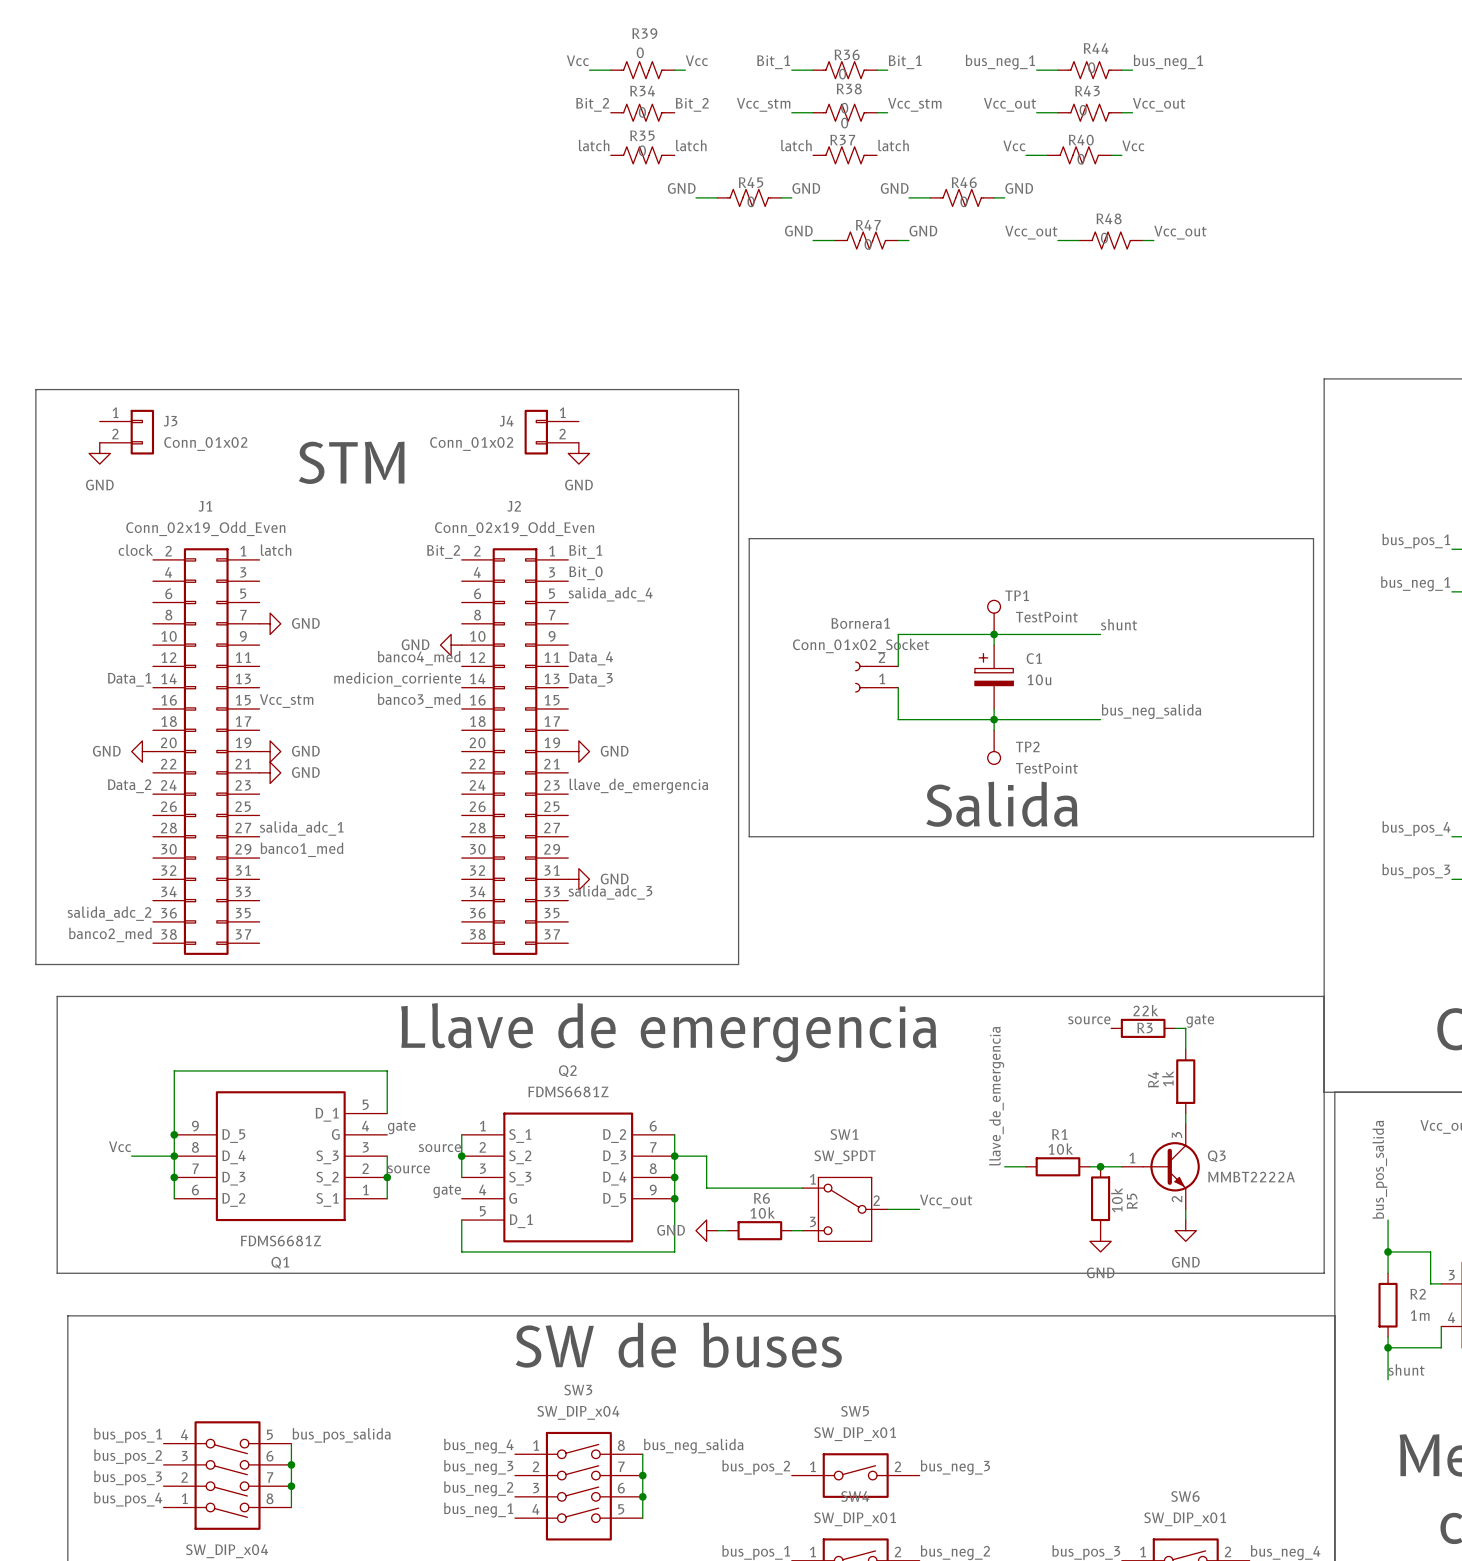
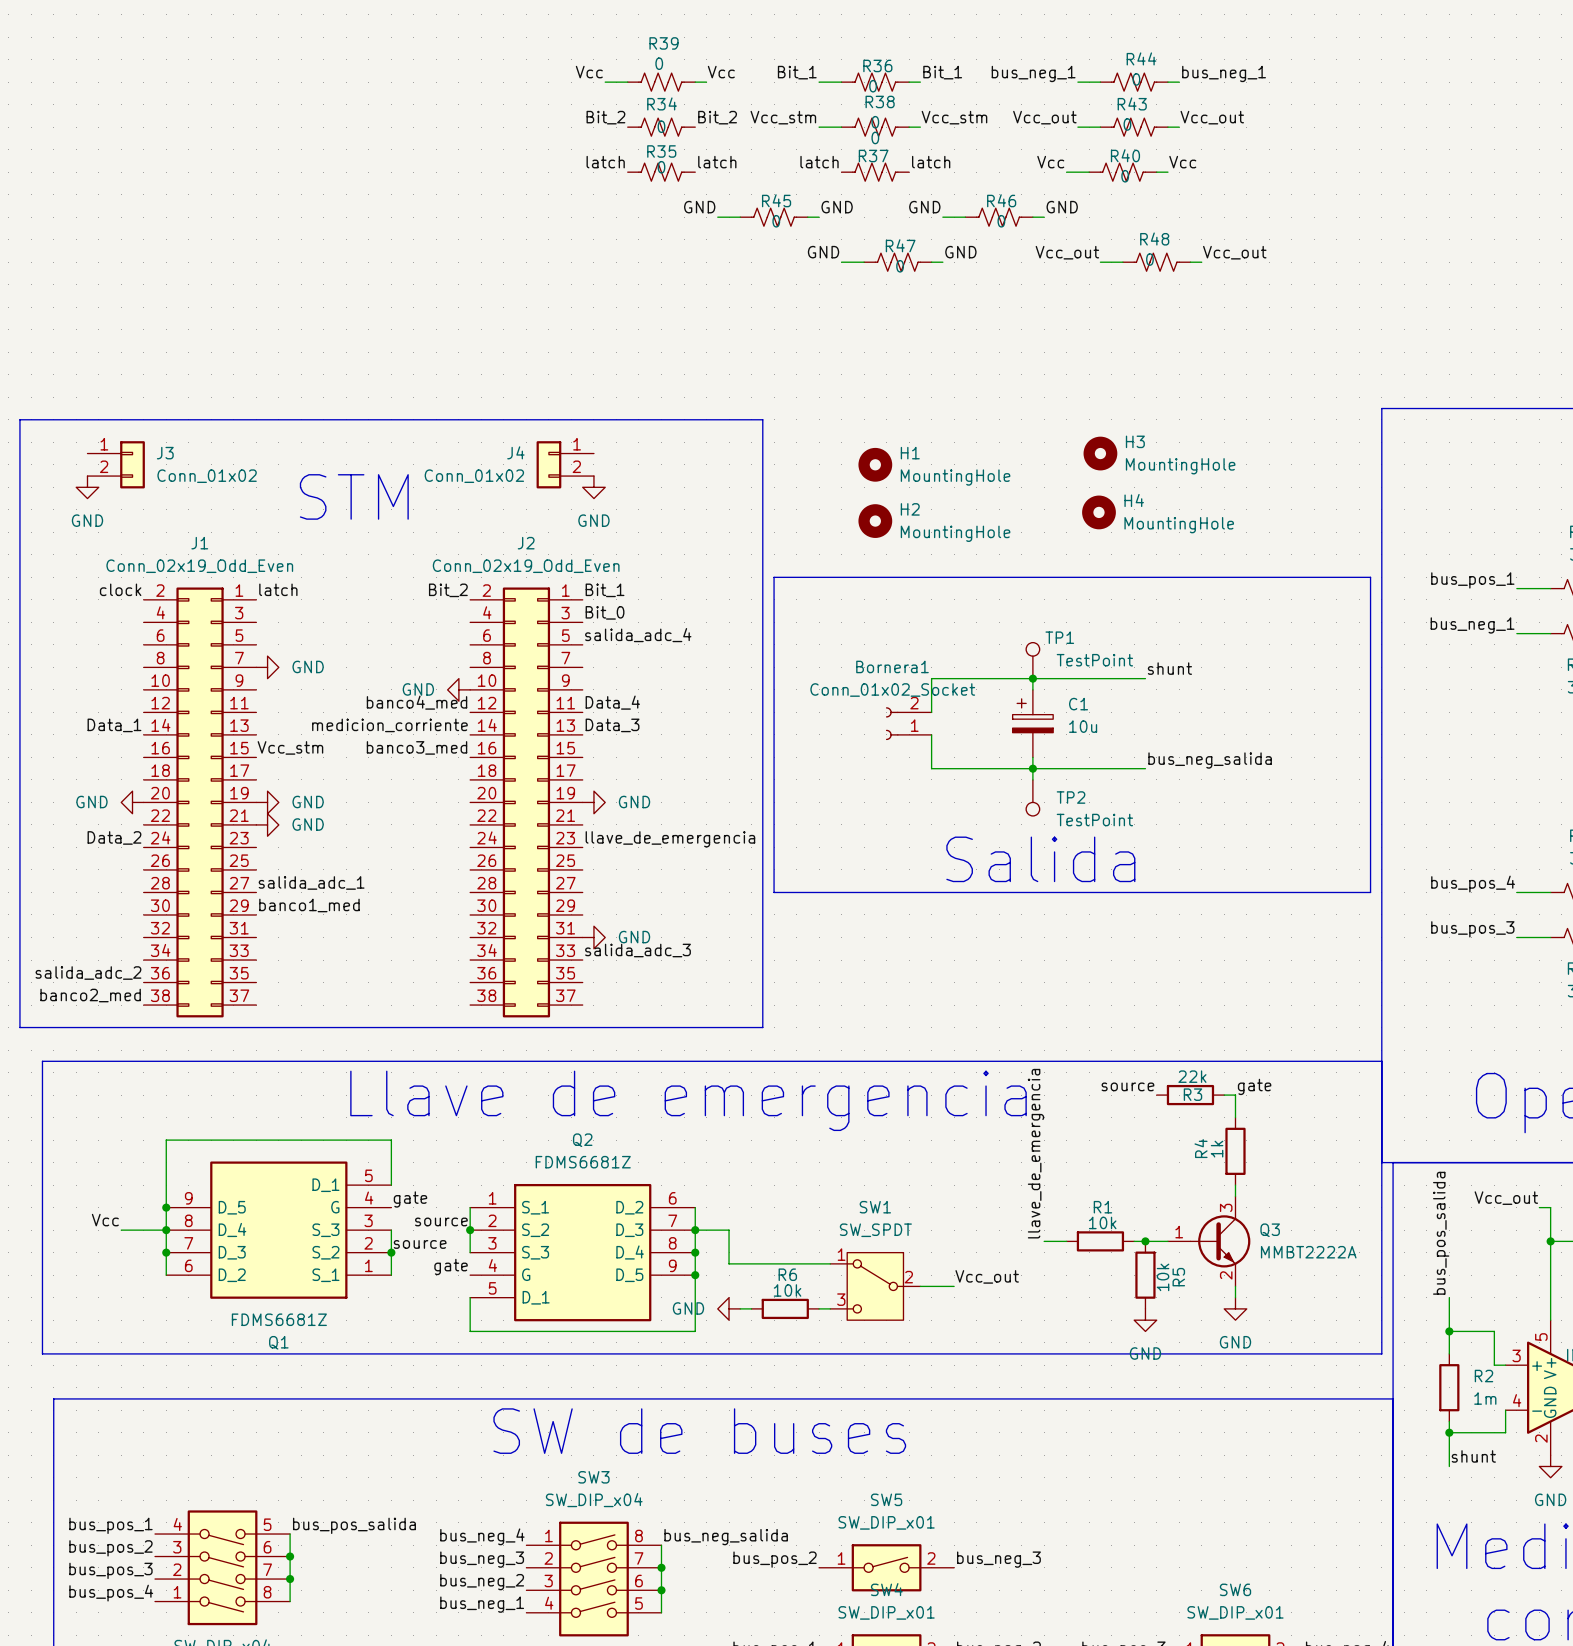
H3: none -> MountingHole (1100, 453)
H1: none -> MountingHole (875, 464)
H4: none -> MountingHole (1098, 512)
H2: none -> MountingHole (875, 521)

